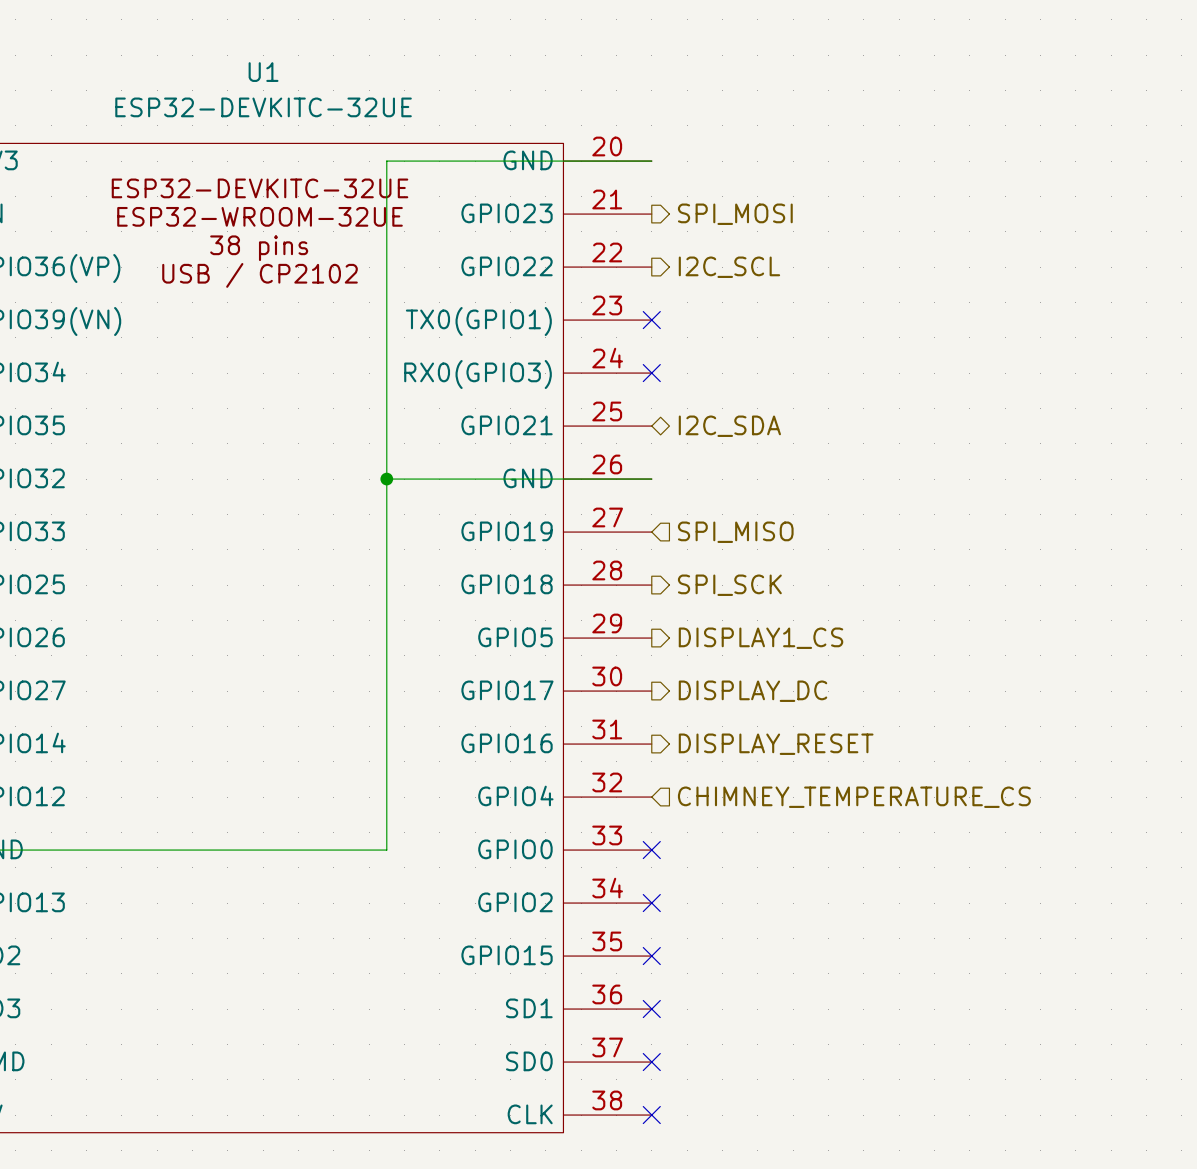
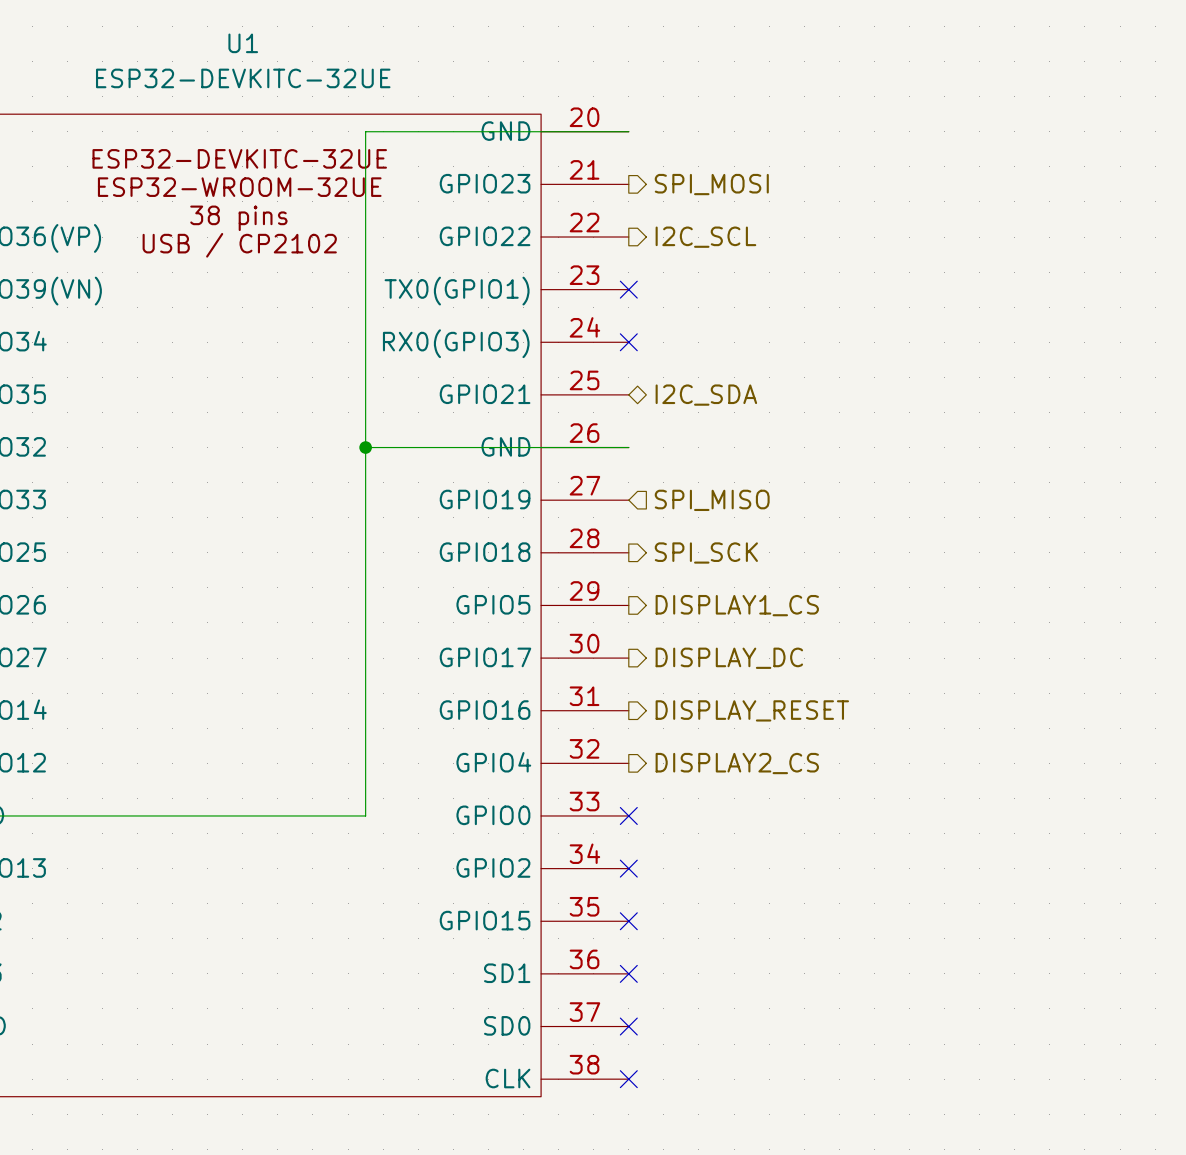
hierarchical label shape: input (854, 797) -> output (737, 763)
hierarchical label: CHIMNEY_TEMPERATURE_CS (854, 797) -> DISPLAY2_CS (737, 763)

